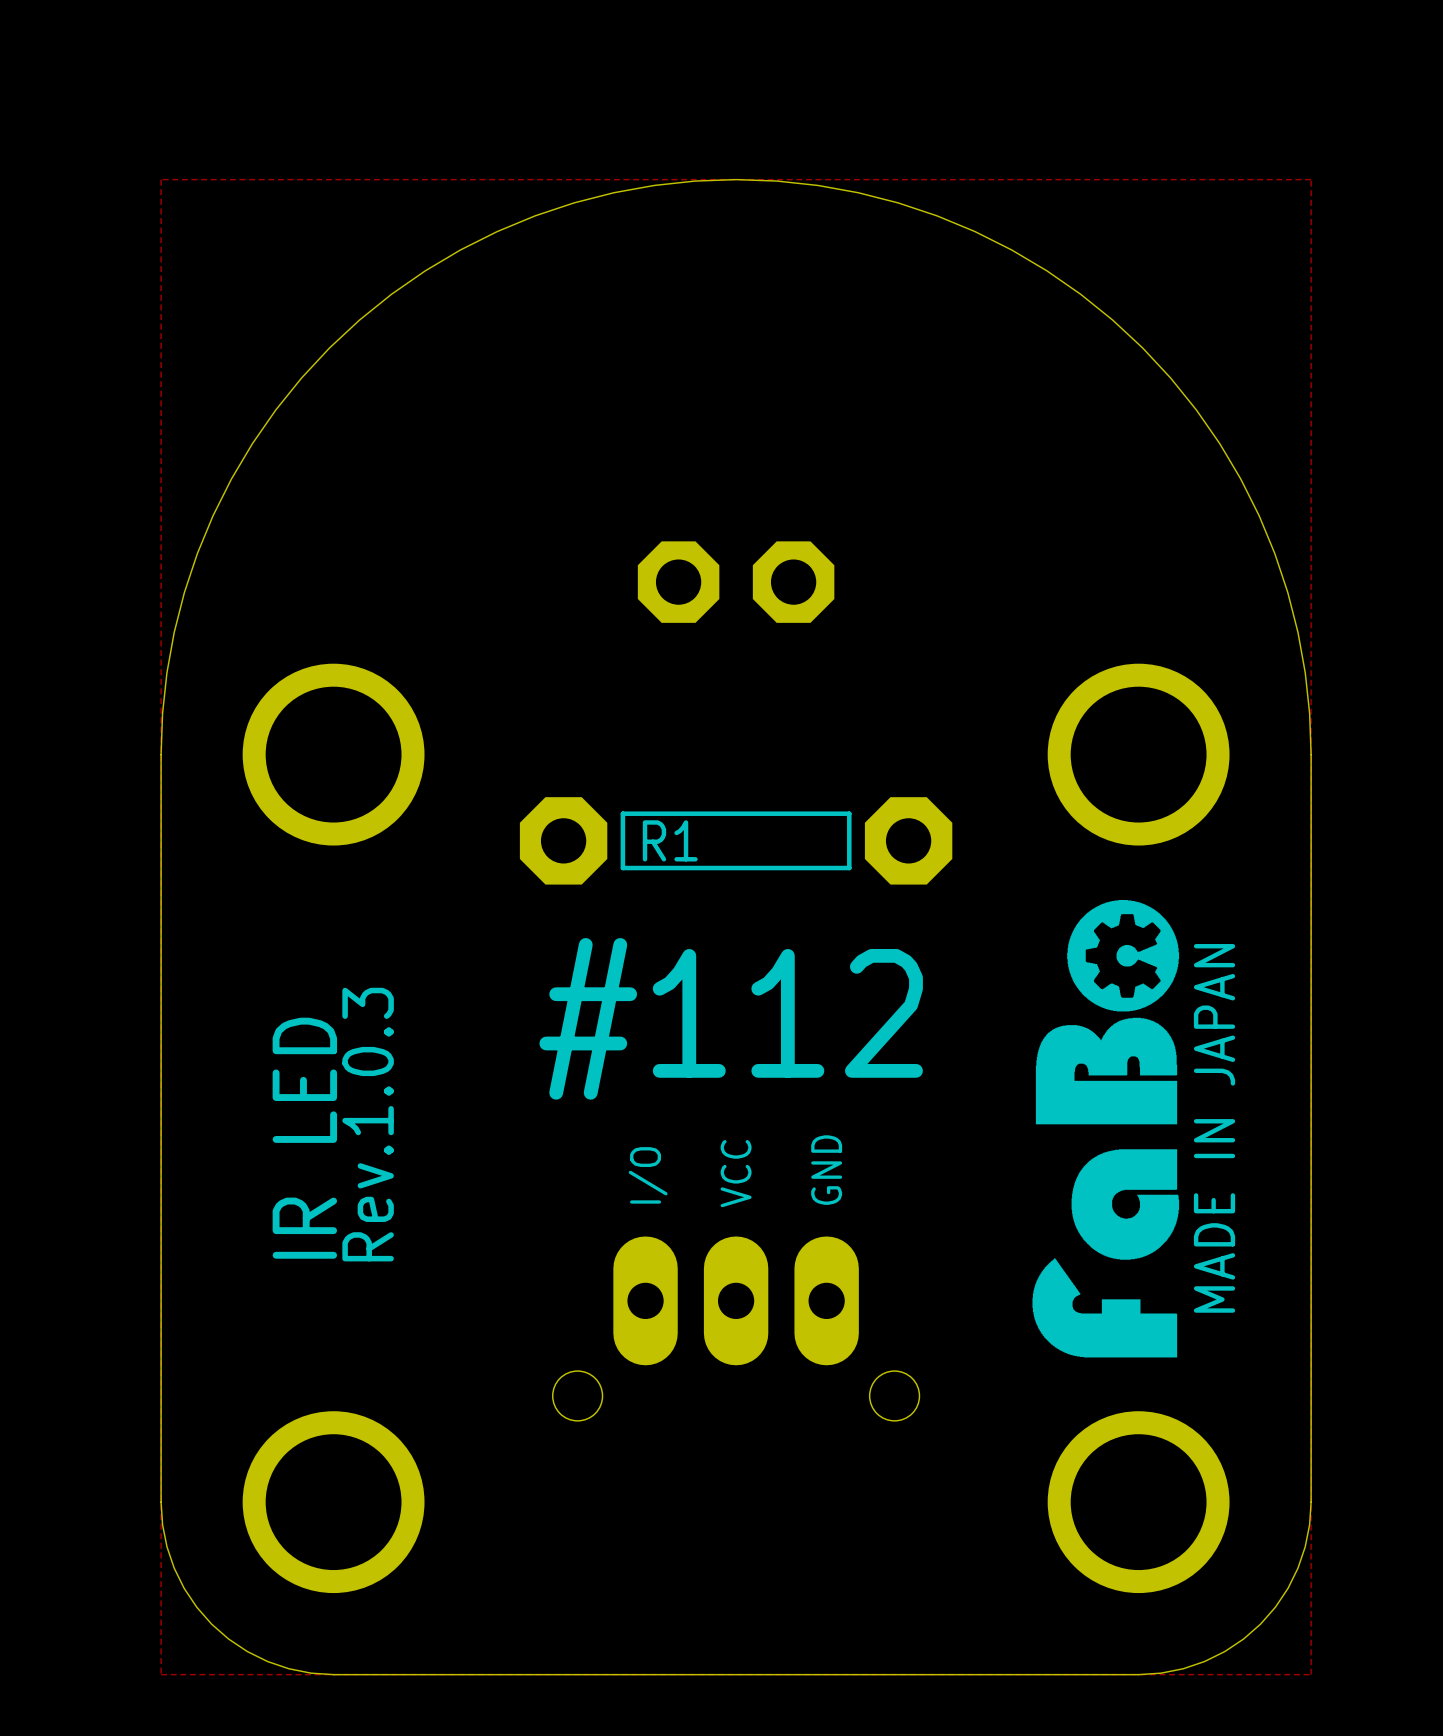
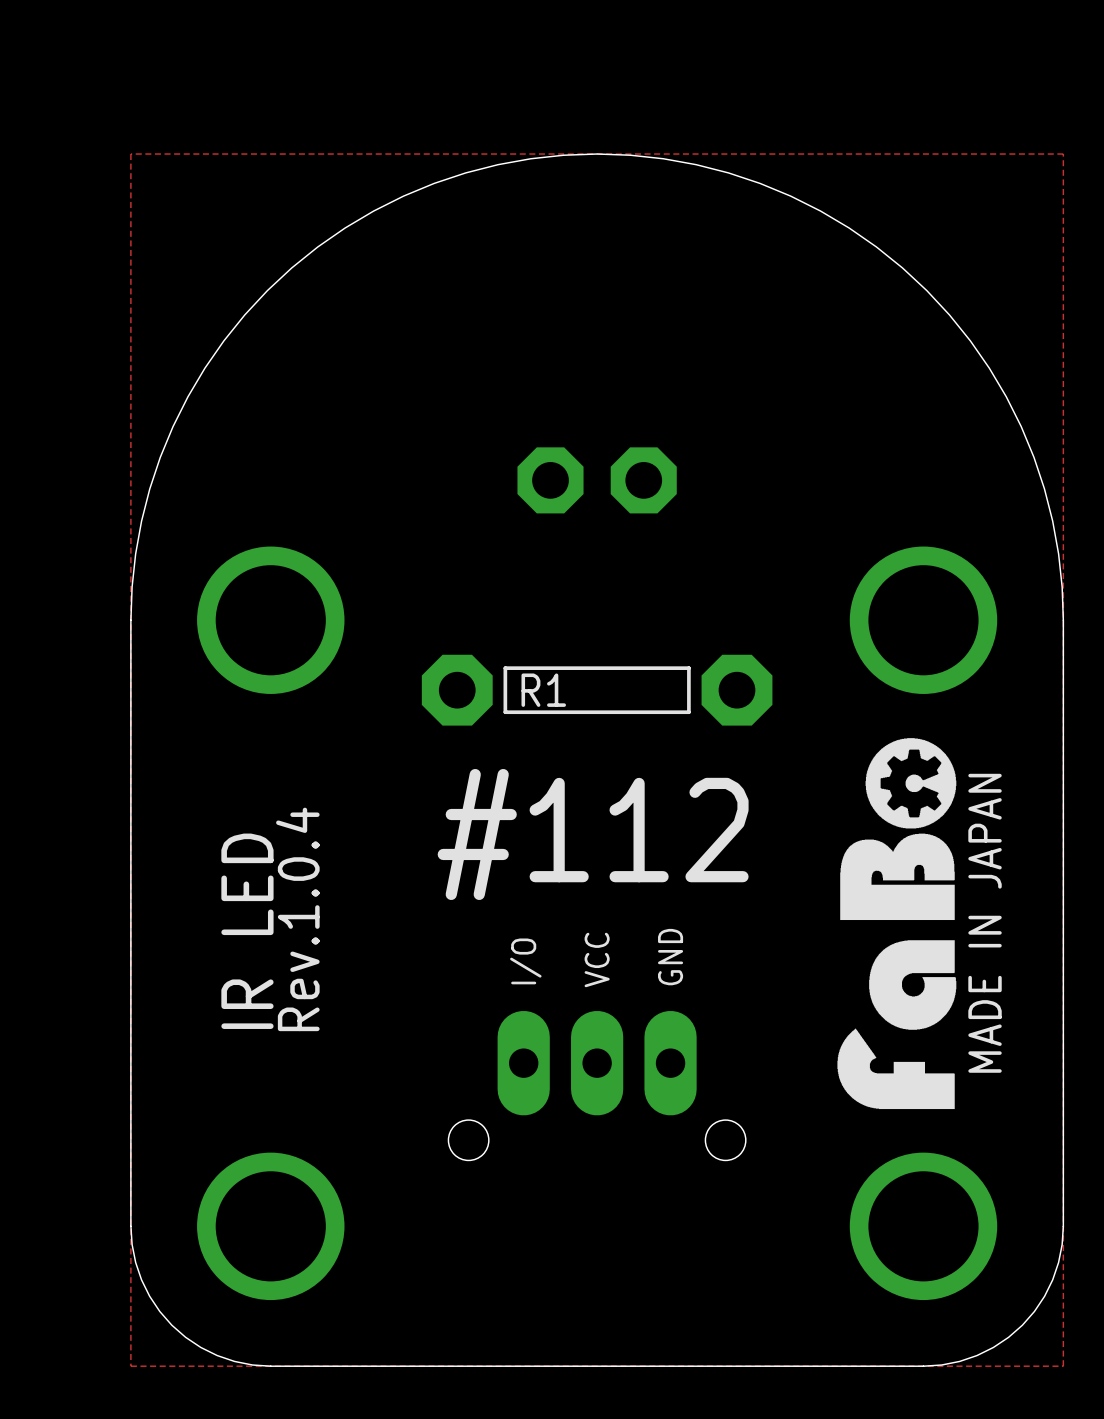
text: Rev.1.0.3 (368, 1124) -> Rev.1.0.4 (297, 919)

